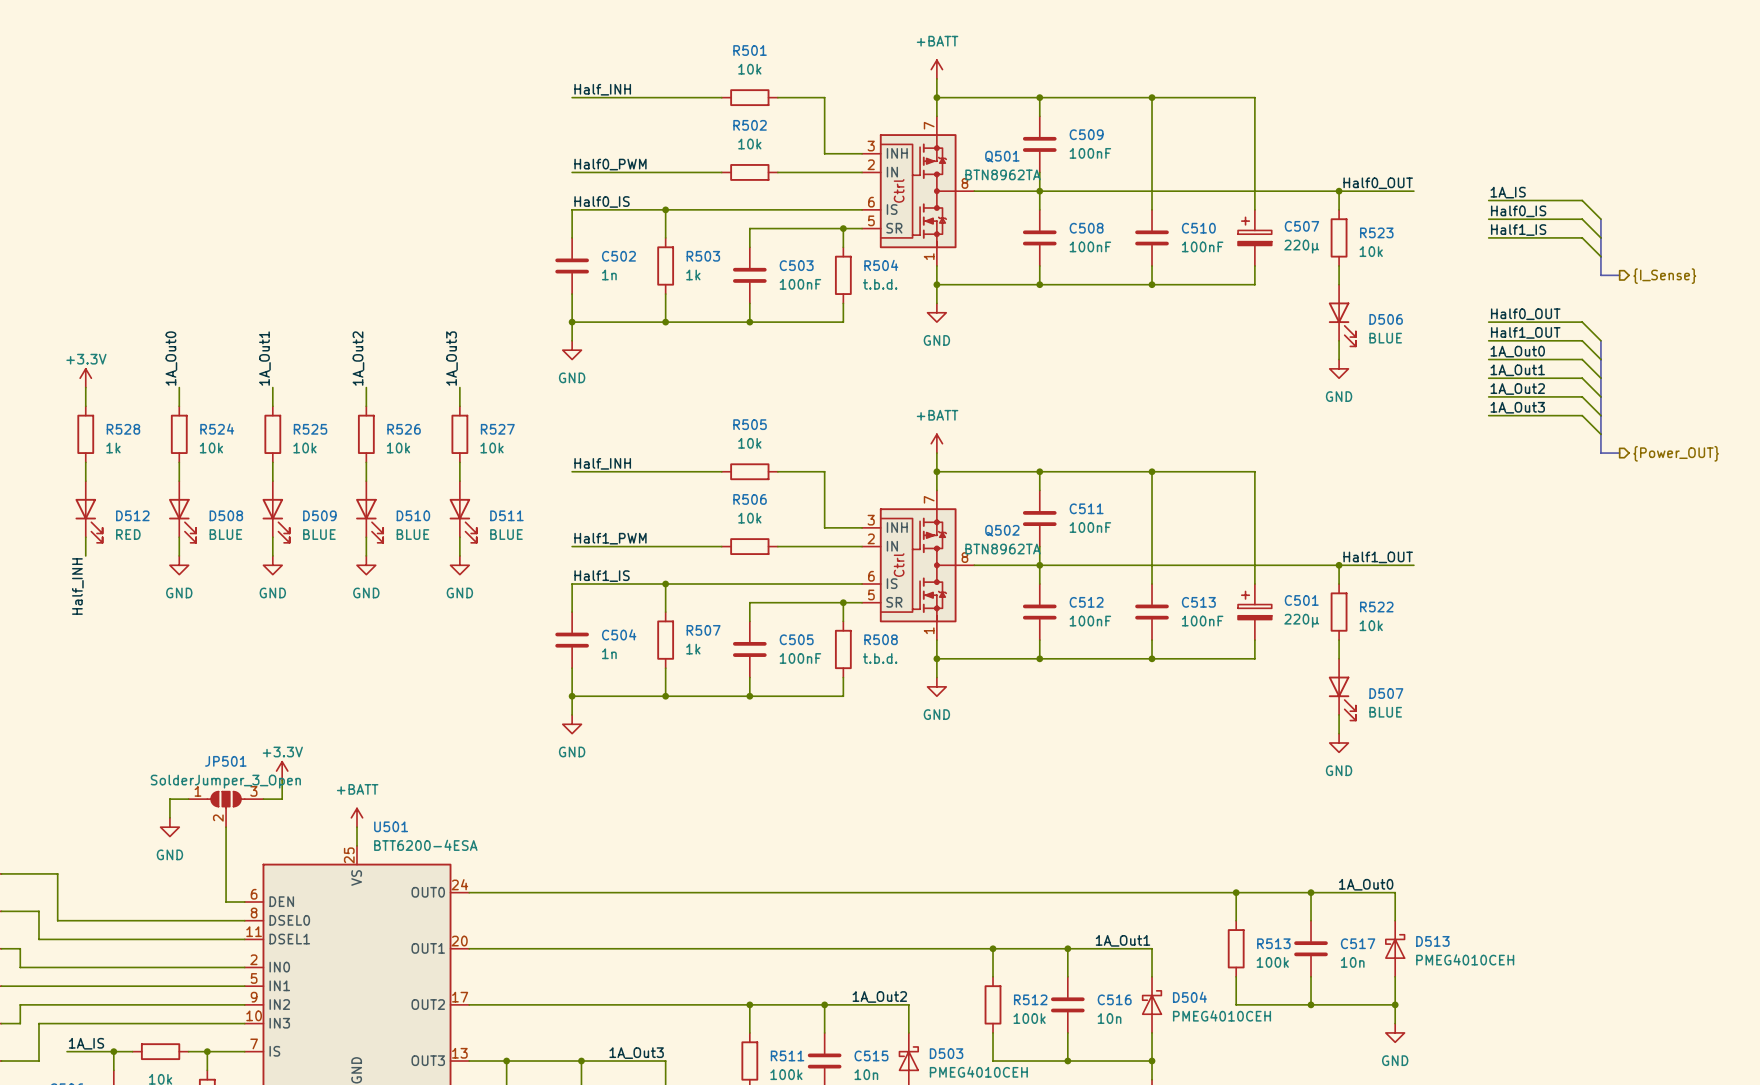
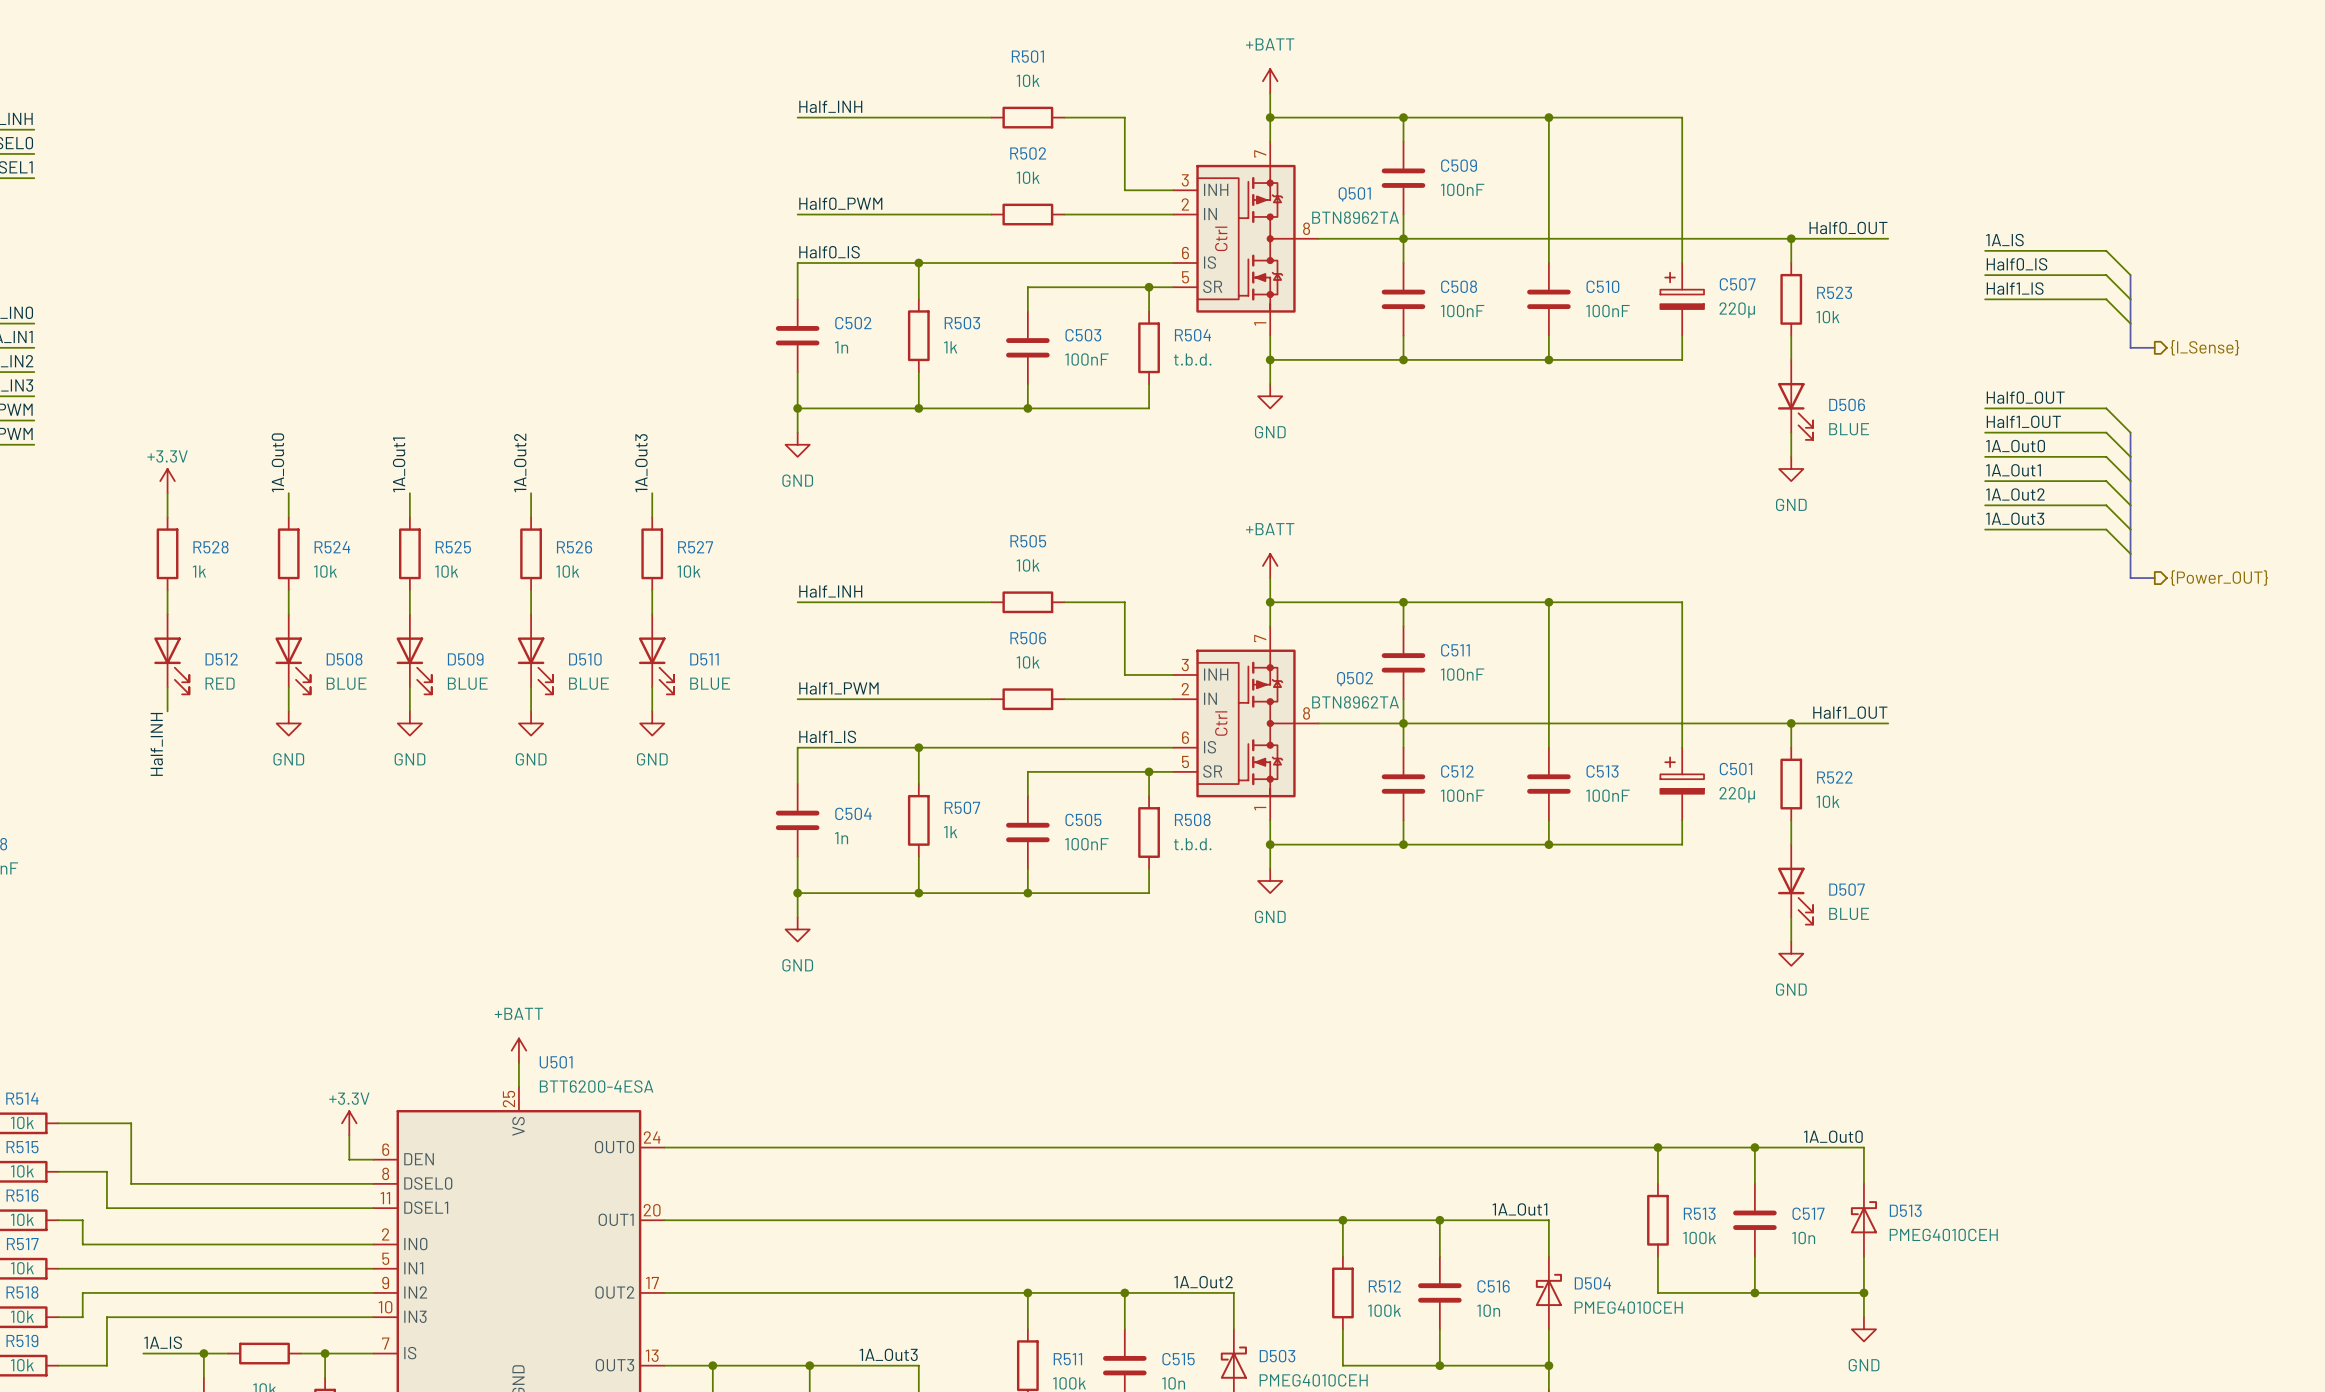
power symbol position: +3.3V (282, 771) -> +3.3V (349, 1123)
wire: (282, 780) (282, 799) (263, 799) -> none
wire: (188, 799) (169, 799) (169, 817) -> none
JP501: SolderJumper_3_Open (226, 809) -> none
power symbol: GND (169, 827) -> none
wire: (226, 827) (226, 883) -> none

